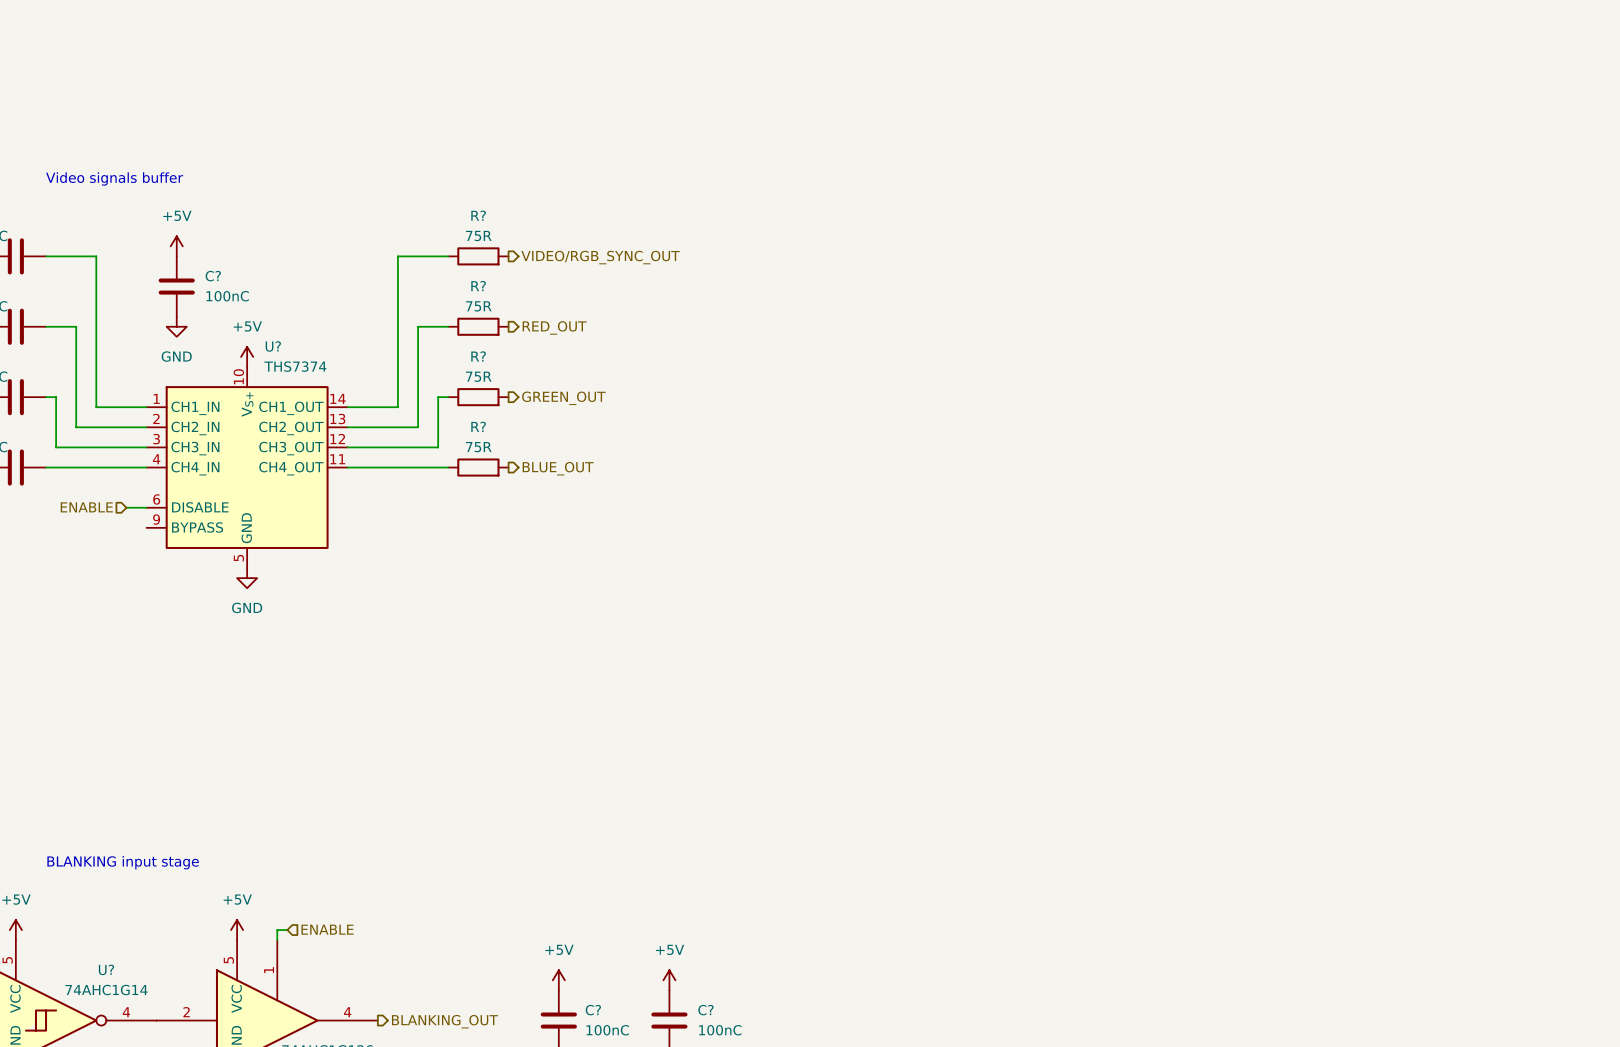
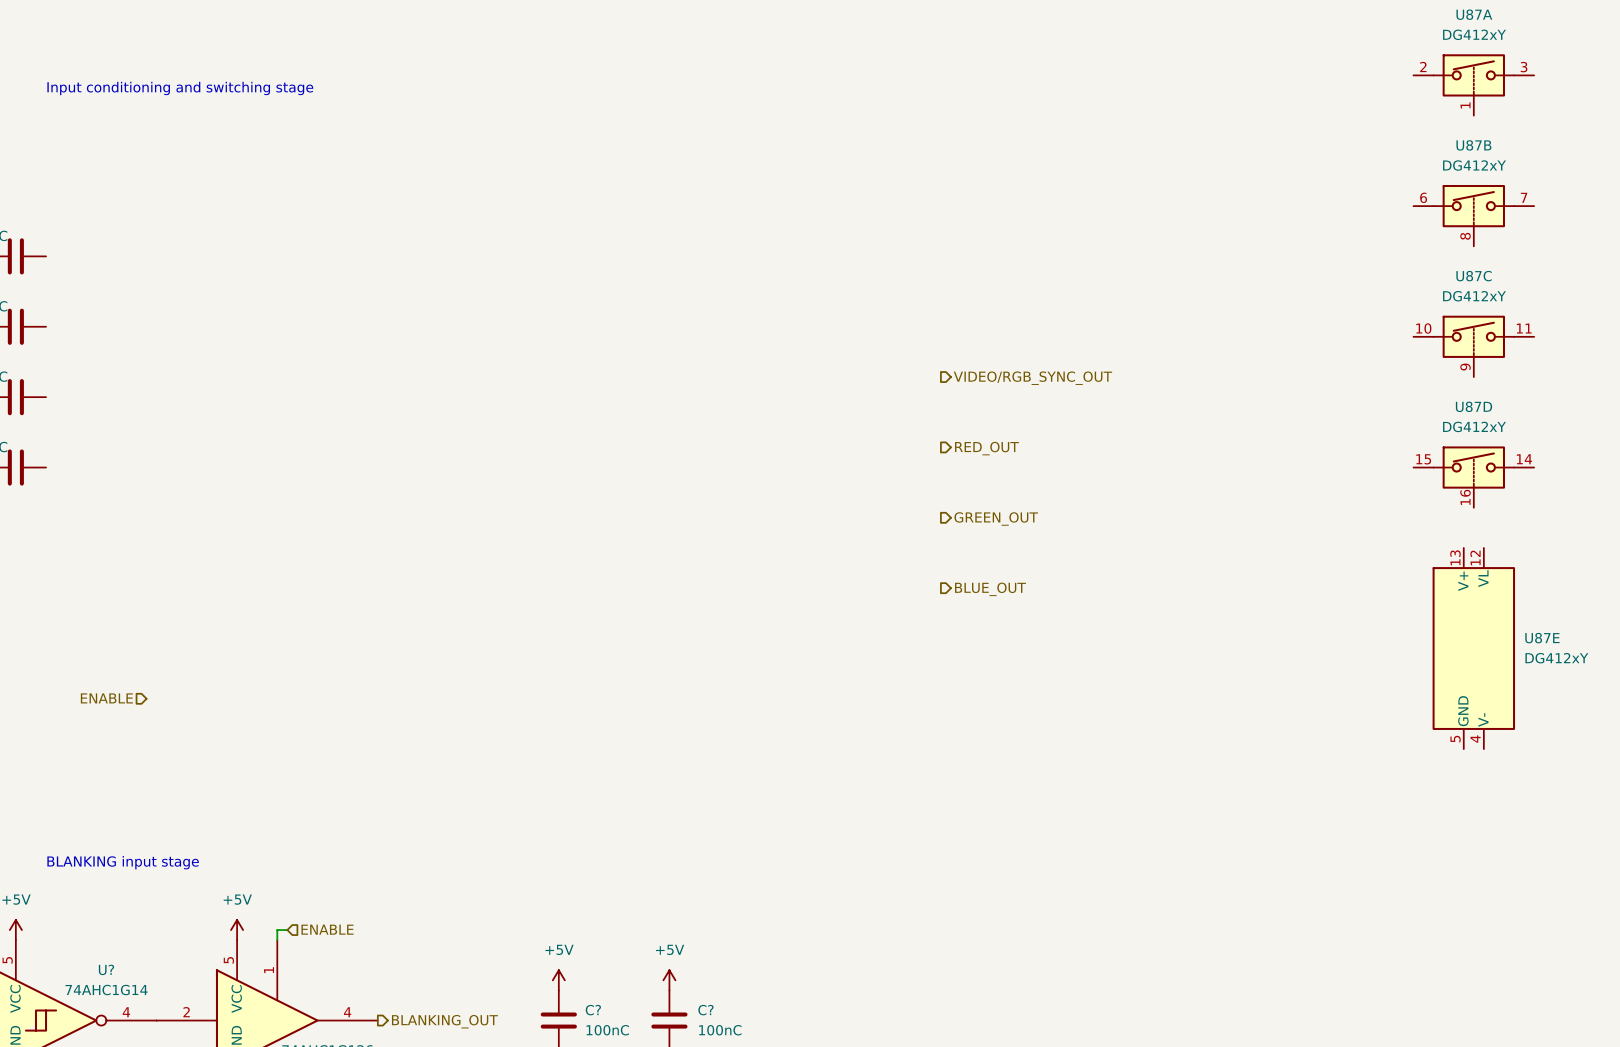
U87A: none -> DG412xY (1473, 84)
text: none -> Input conditioning and switching stage (180, 88)
text: Video signals buffer (114, 178) -> none
U87B: none -> DG412xY (1473, 215)
power symbol: +5V (176, 246) -> none
wire: (46, 256) (96, 256) (96, 407) (146, 407) -> none
wire: (448, 256) (397, 256) (397, 407) (347, 407) -> none
R?: 75R (478, 256) -> none
hierarchical label: VIDEO/RGB_SYNC_OUT (600, 257) -> none
C?: 100nC (176, 286) -> none
wire: (46, 326) (76, 326) (76, 427) (146, 427) -> none
power symbol: GND (176, 326) -> none
wire: (448, 326) (418, 326) (418, 427) (347, 427) -> none
R?: 75R (478, 326) -> none
hierarchical label: RED_OUT (554, 327) -> none
U87C: none -> DG412xY (1473, 346)
power symbol: +5V (247, 356) -> none
hierarchical label: none -> VIDEO/RGB_SYNC_OUT (1032, 378)
wire: (46, 397) (56, 397) (56, 447) (146, 447) -> none
wire: (448, 397) (438, 397) (438, 447) (347, 447) -> none
R?: 75R (478, 397) -> none
hierarchical label: GREEN_OUT (563, 398) -> none
hierarchical label: none -> RED_OUT (986, 448)
wire: (46, 467) (146, 467) -> none
U?: THS7374 (247, 467) -> none
wire: (347, 467) (448, 467) -> none
R?: 75R (478, 467) -> none
hierarchical label: BLUE_OUT (558, 468) -> none
U87D: none -> DG412xY (1473, 477)
hierarchical label position: ENABLE (86, 507) -> ENABLE (106, 698)
wire: (126, 507) (146, 507) -> none
hierarchical label: none -> GREEN_OUT (996, 518)
power symbol: GND (247, 578) -> none
hierarchical label: none -> BLUE_OUT (990, 589)
U87E: none -> DG412xY (1473, 648)

